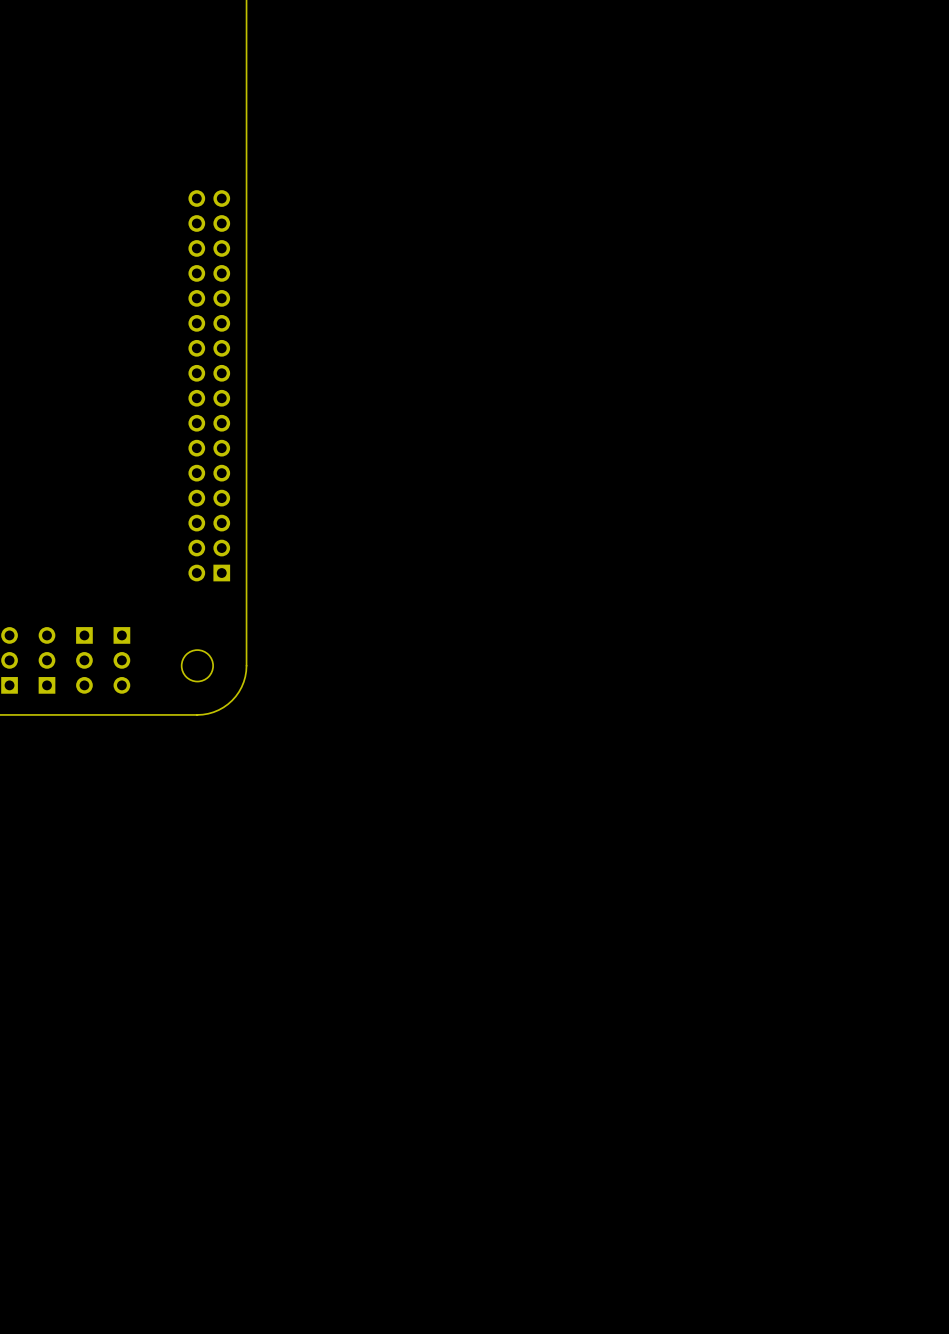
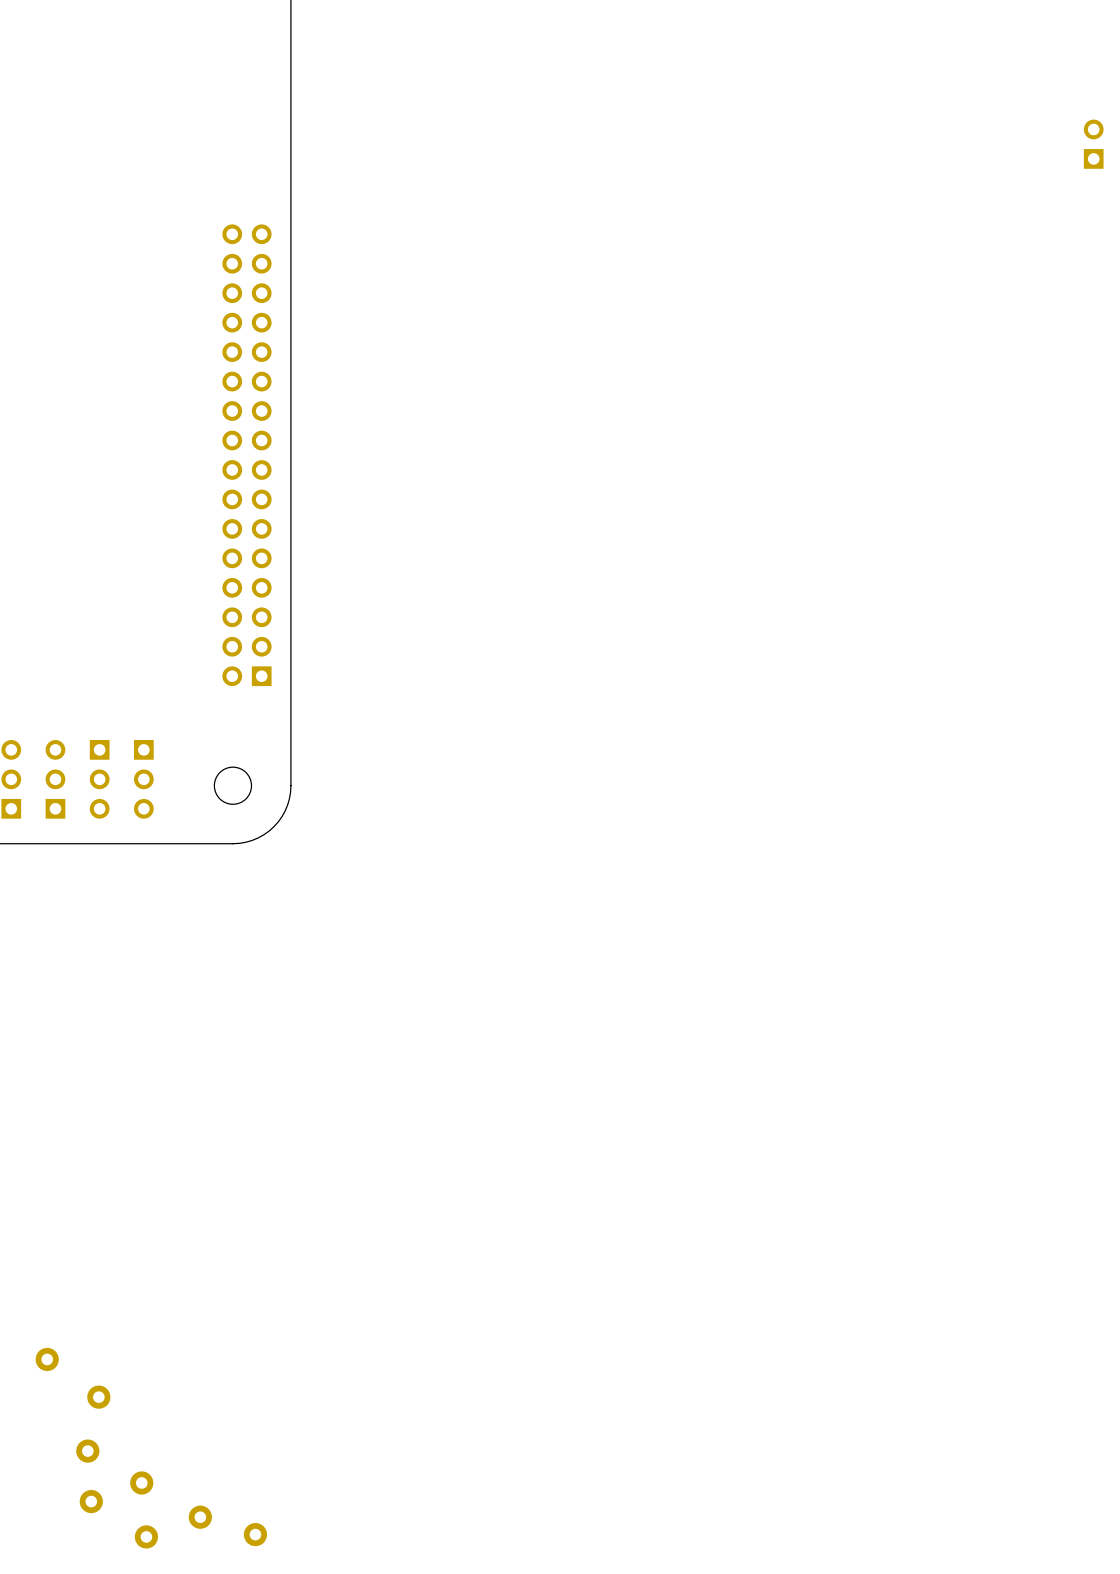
part: none -> (1093, 144)
part: none -> (47, 1359)
part: none -> (98, 1397)
part: none -> (87, 1451)
part: none -> (141, 1482)
part: none -> (91, 1501)
part: none -> (200, 1517)
part: none -> (255, 1534)
part: none -> (146, 1536)

